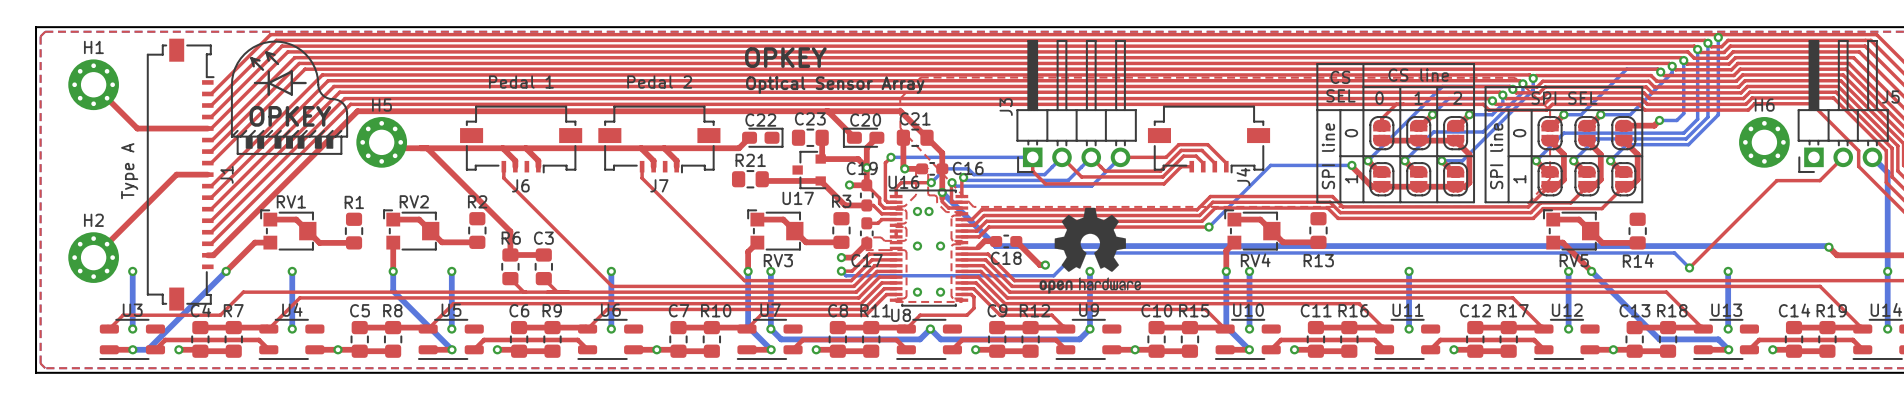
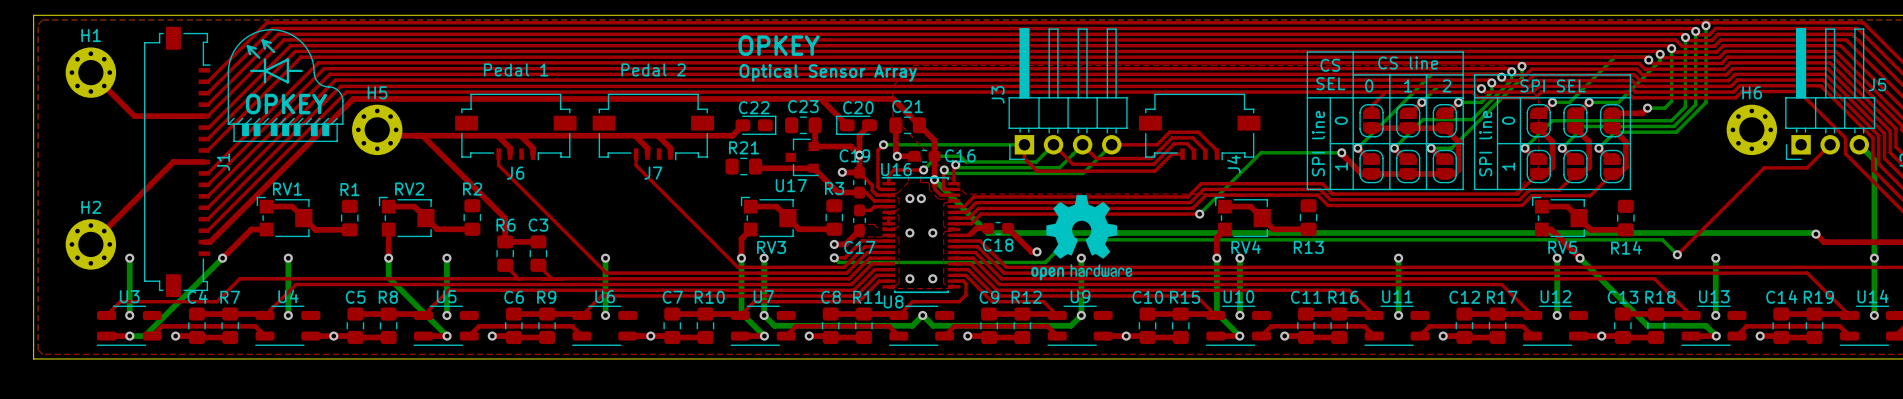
text: Type A (129, 171) -> none

